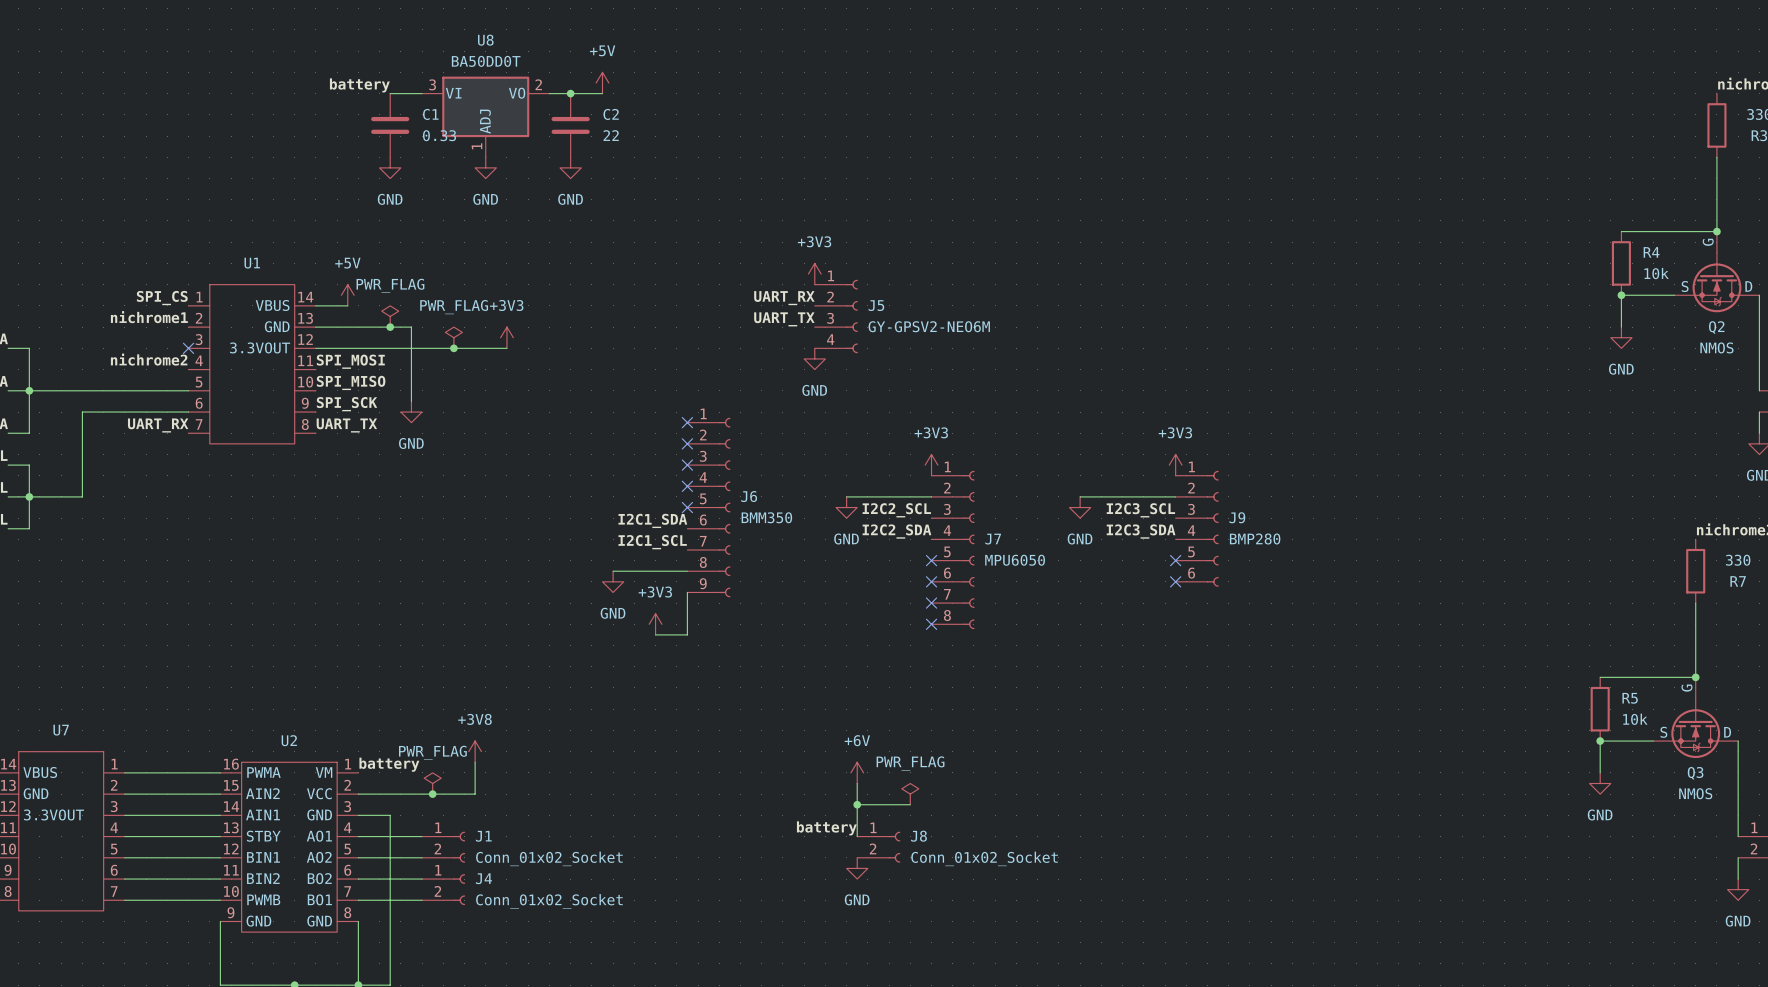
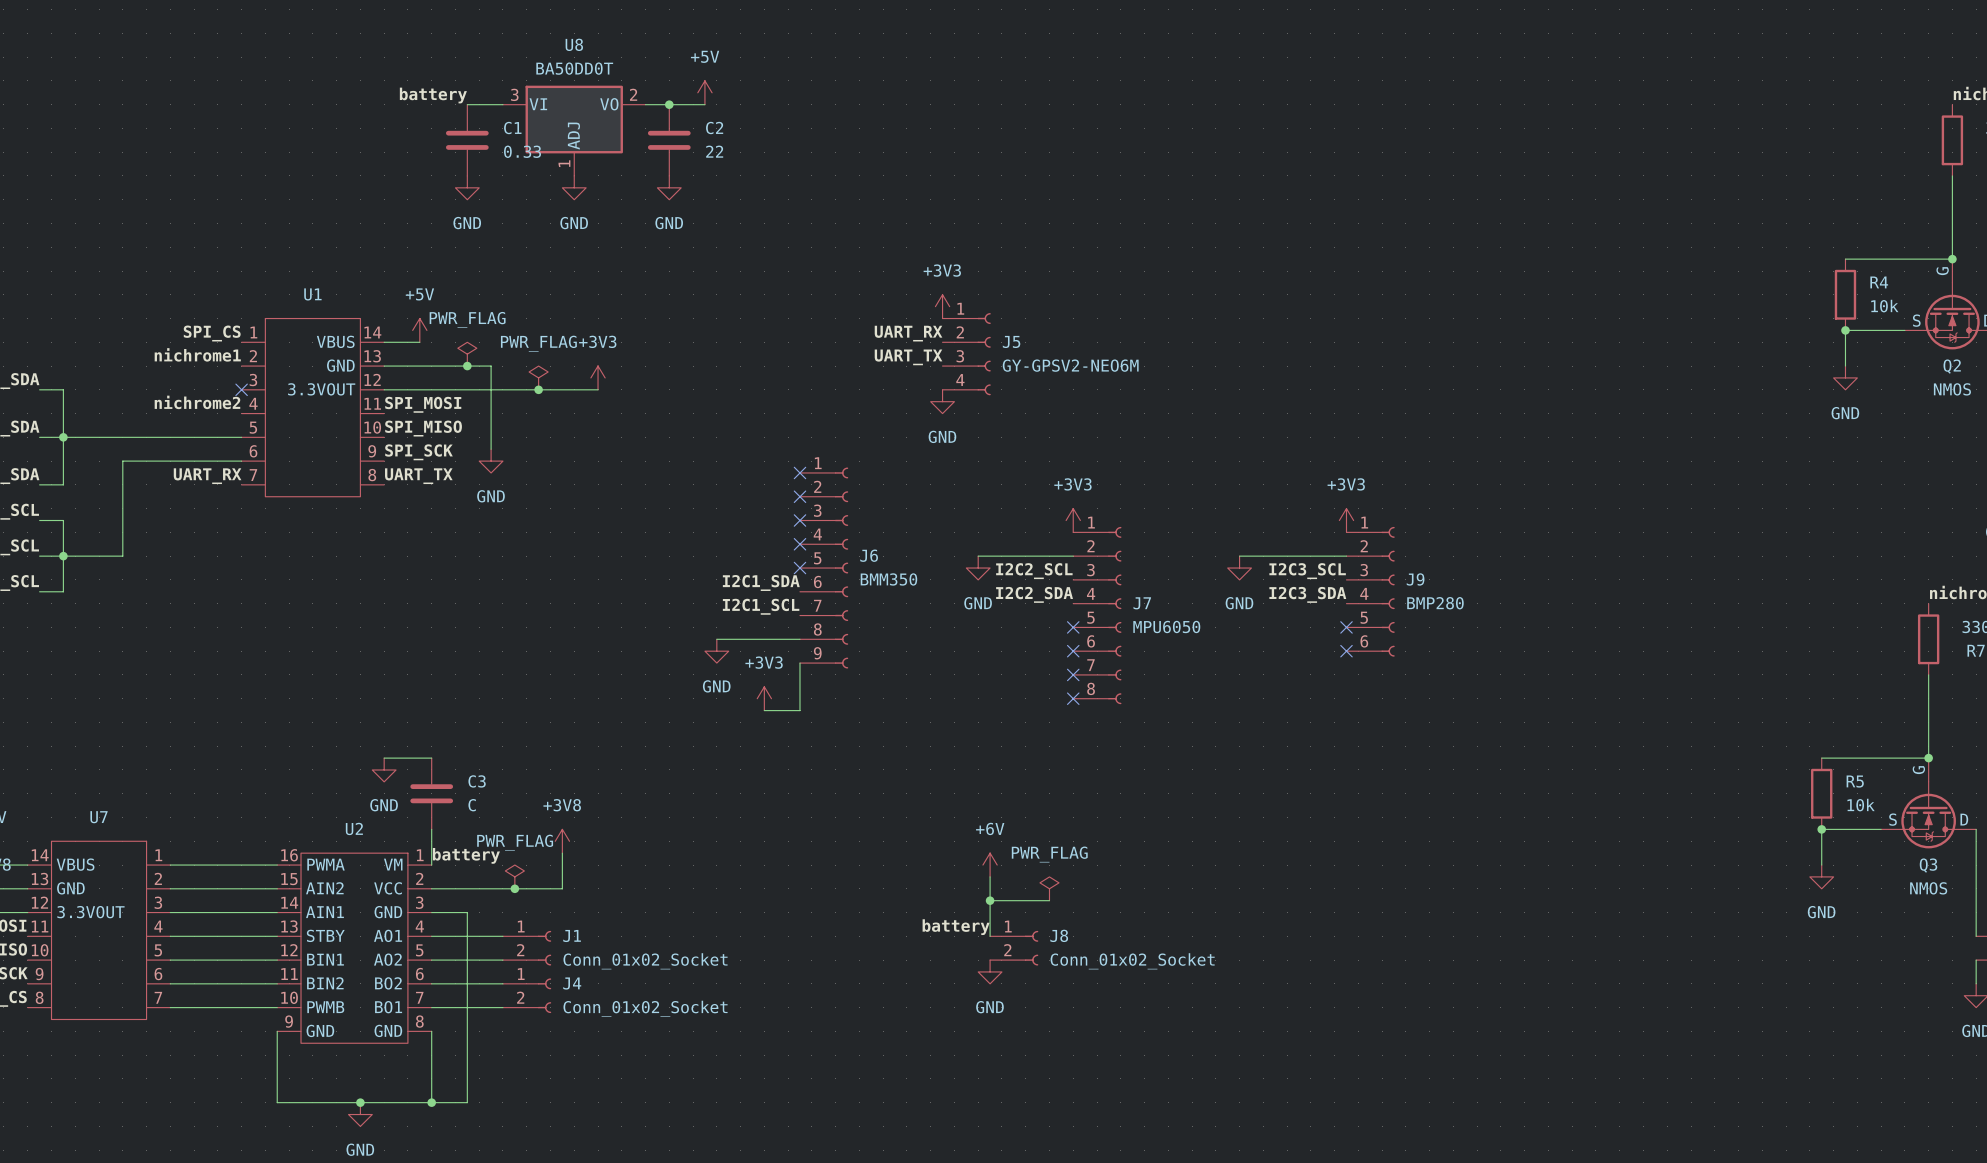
wire: none -> (384, 758) (431, 758)
power symbol: none -> GND (384, 769)
C3: none -> C (431, 793)
wire: none -> (431, 829) (431, 865)

